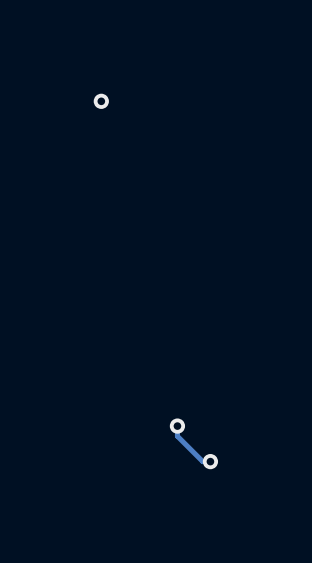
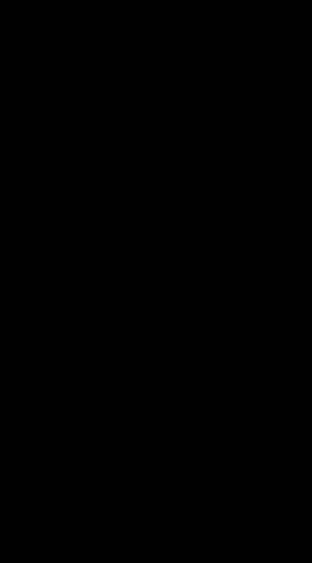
via: (101, 101) -> none
track: (177, 426) (177, 436) (202, 461) (210, 461) -> none
via: (177, 426) -> none
via: (210, 461) -> none

